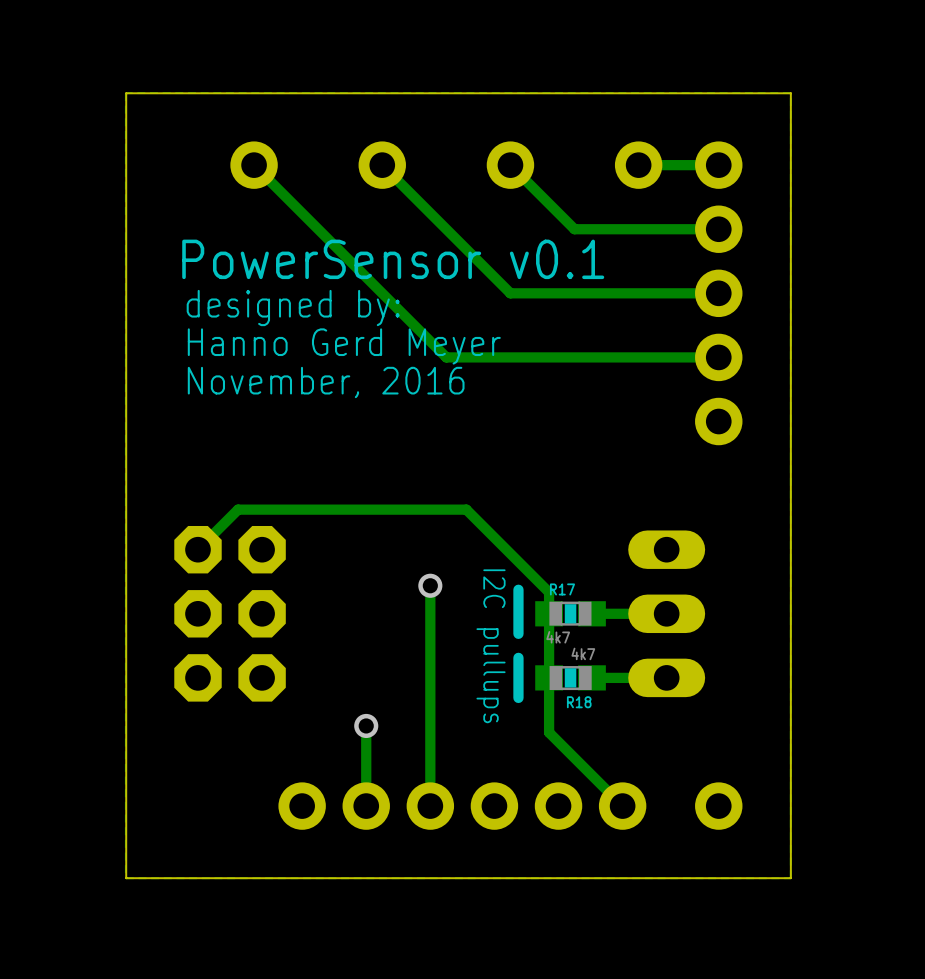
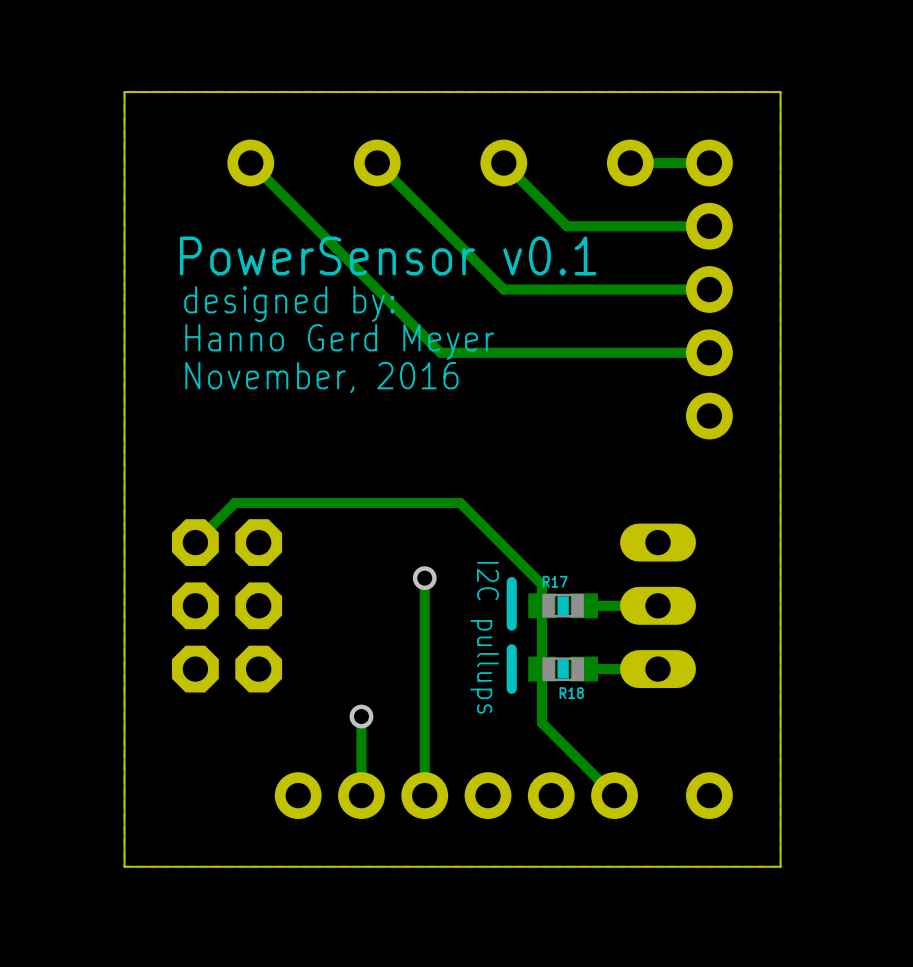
R17 value: 4k7 (558, 637) -> none
R18 value: 4k7 (583, 653) -> none

